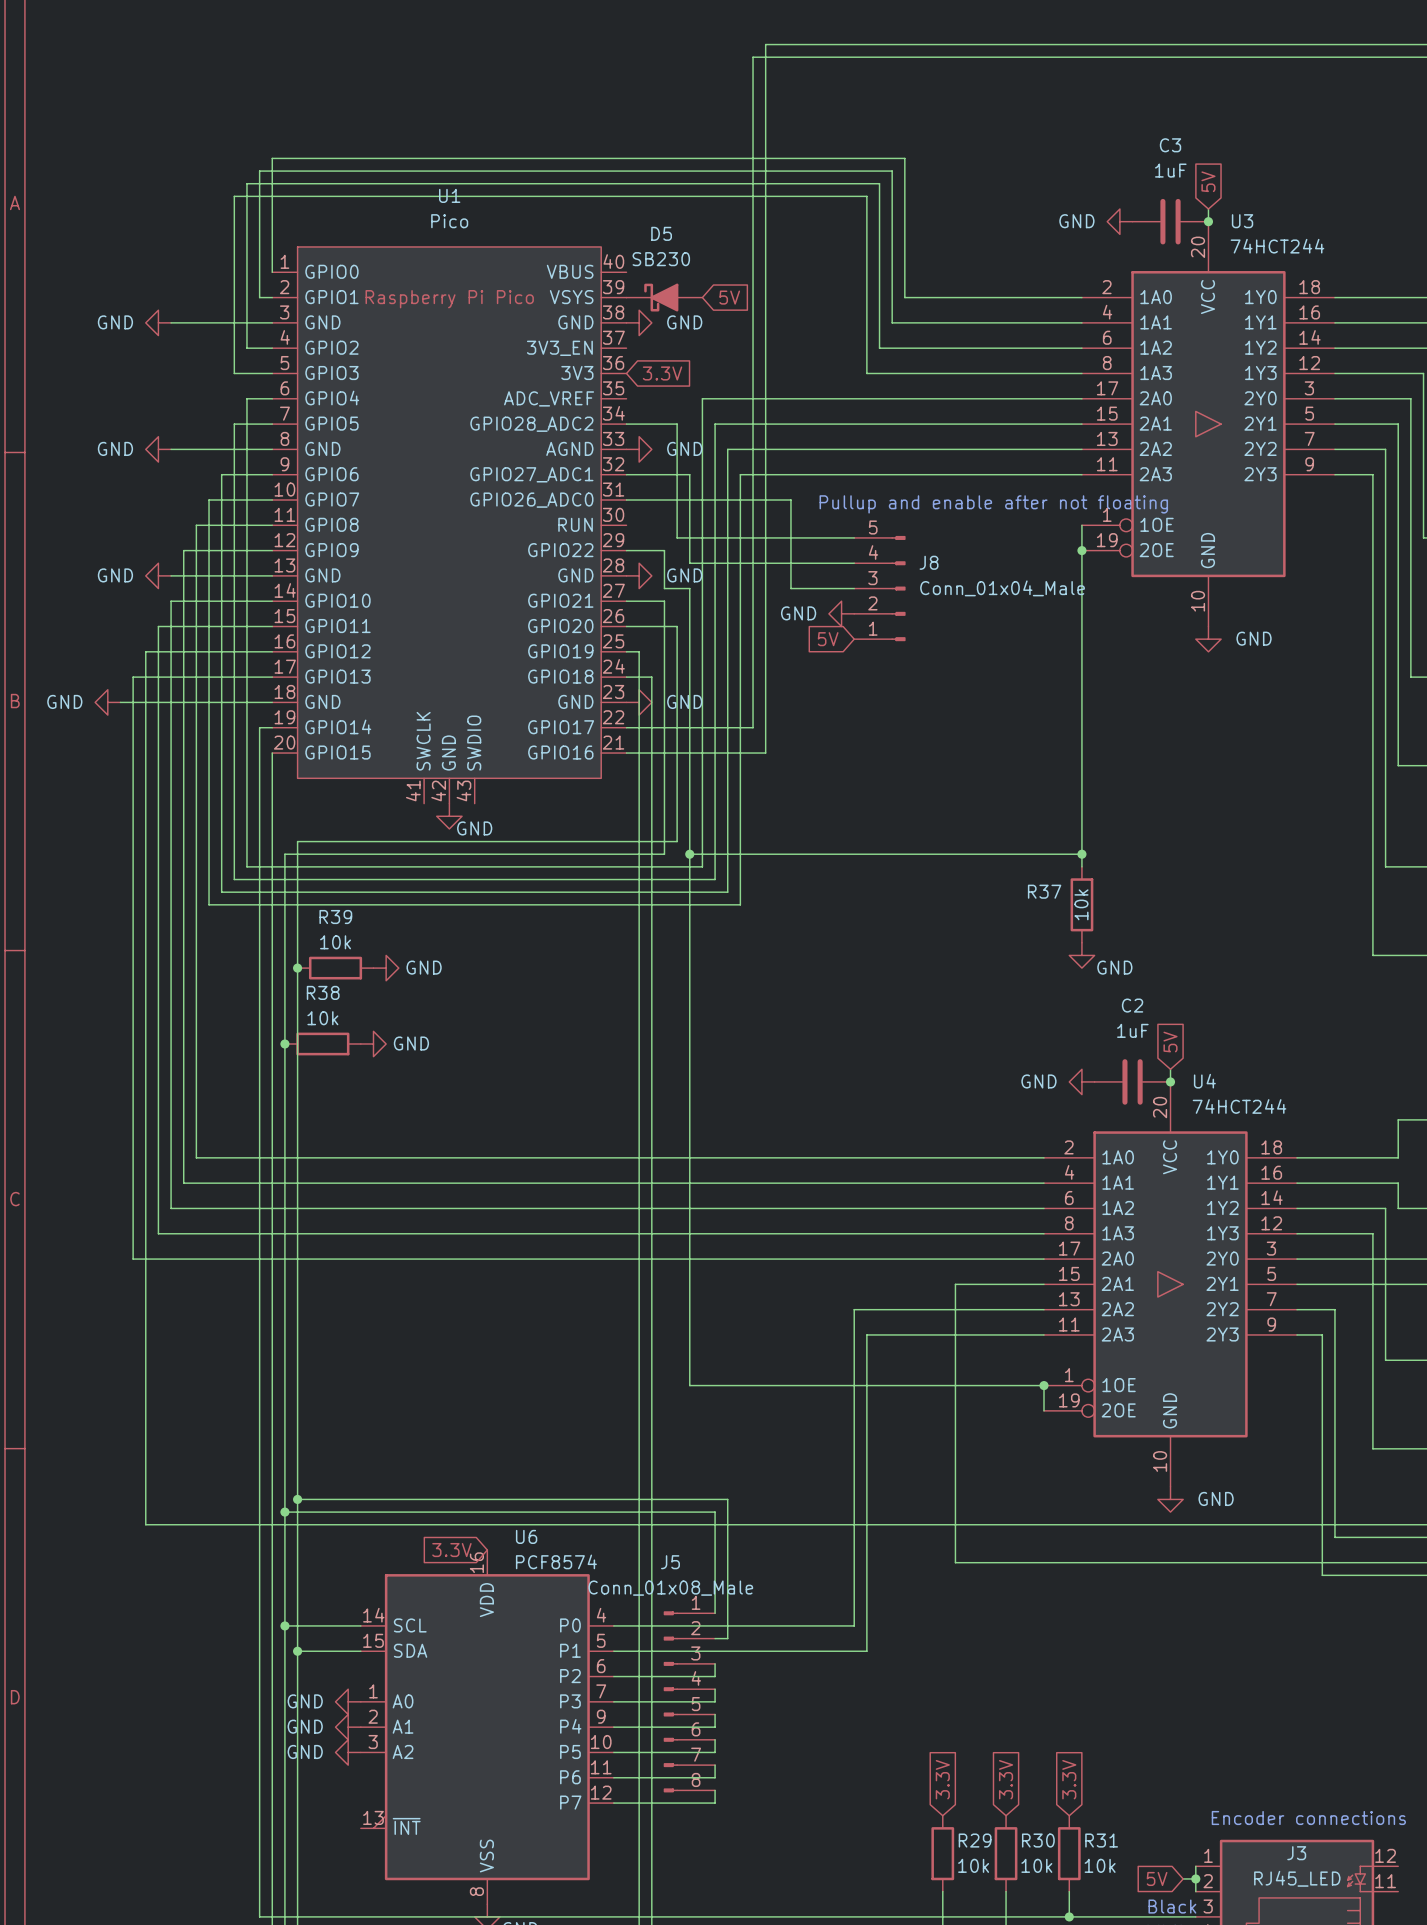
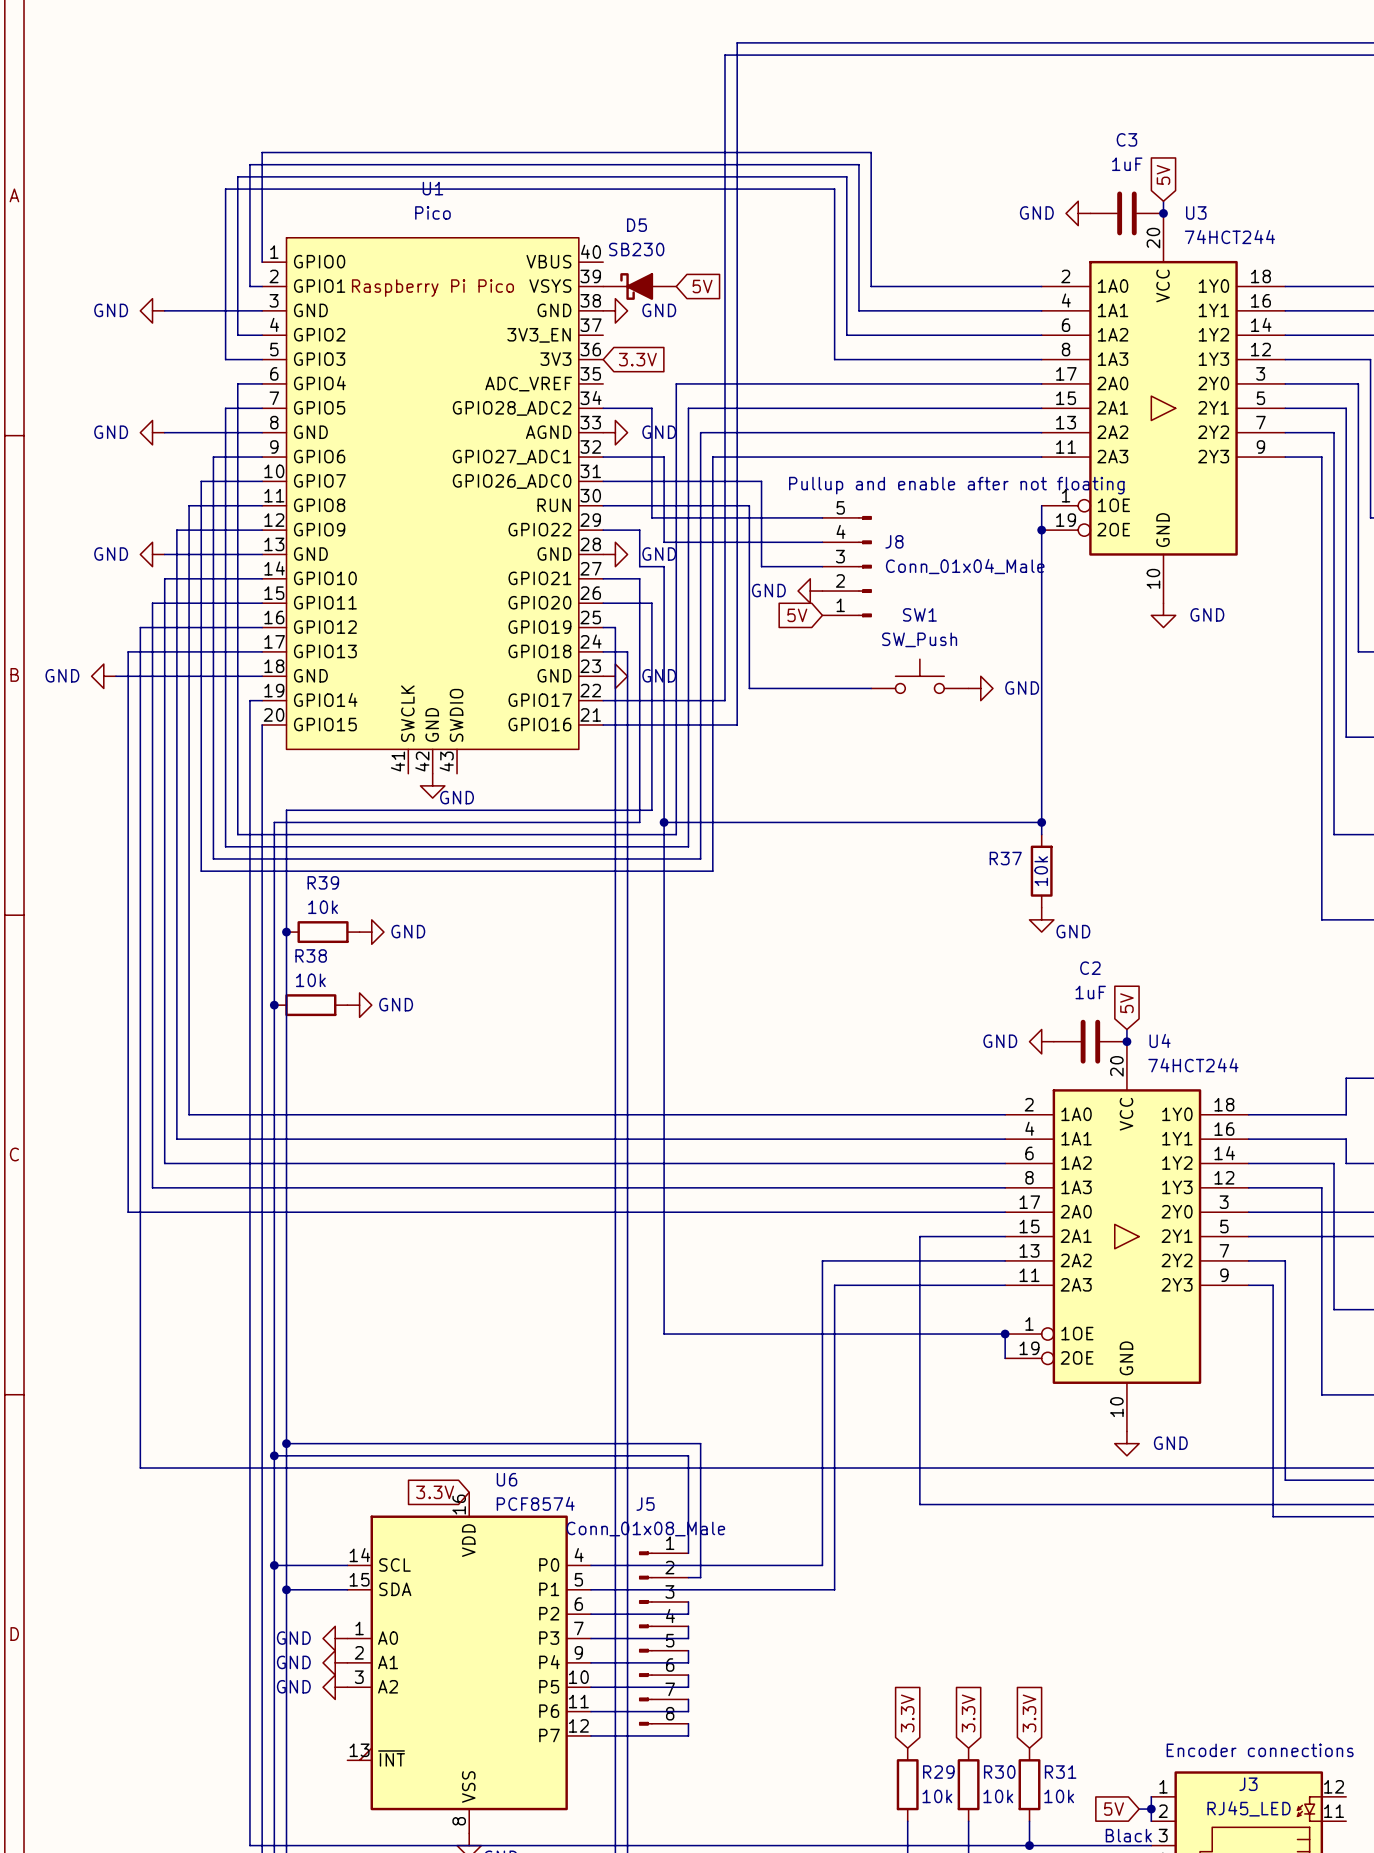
wire: none -> (603, 505) (749, 505) (749, 688) (871, 688)
SW1: none -> SW_Push (919, 676)
power symbol: none -> GND (980, 688)

